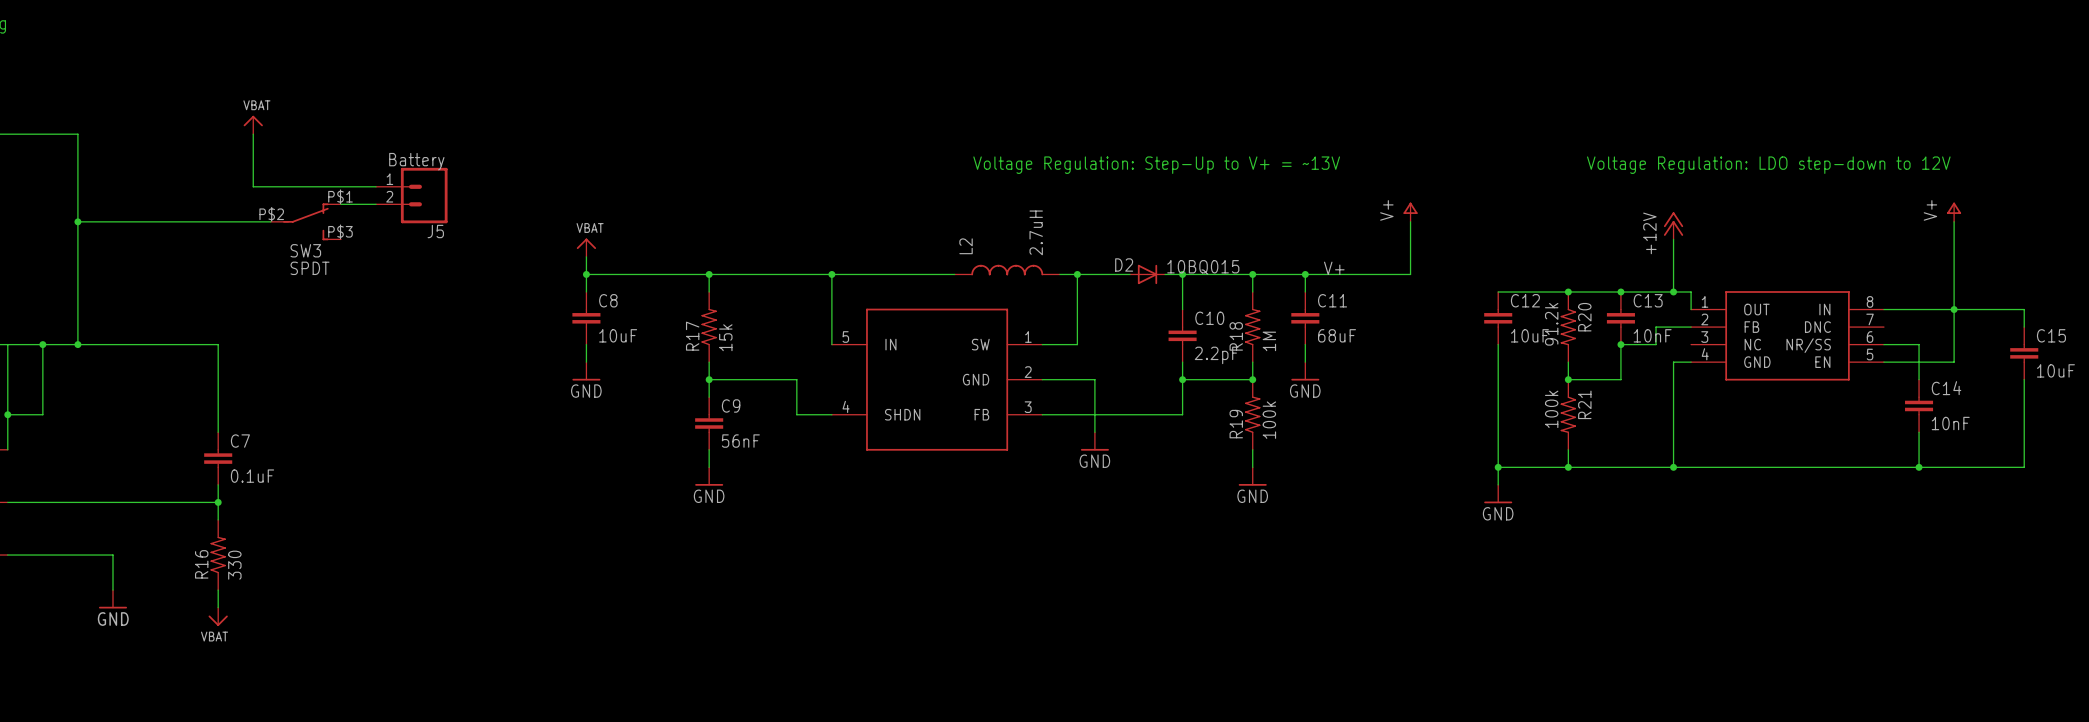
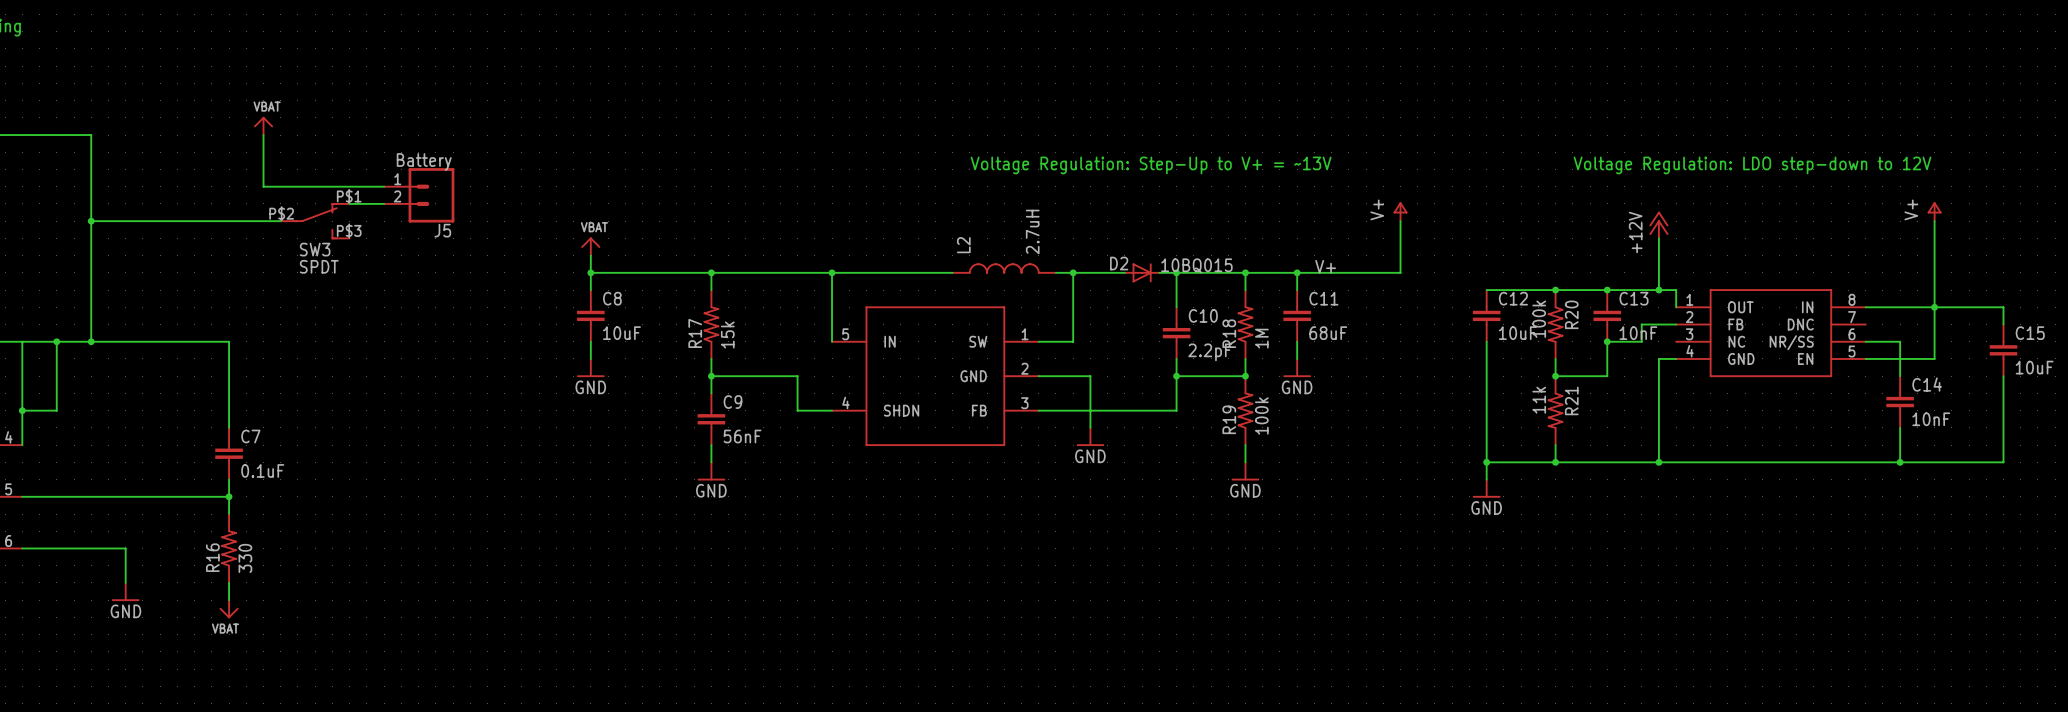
R20 value: 91.2k (1551, 324) -> 100k (1539, 319)
R21 value: 100k (1551, 409) -> 11k (1539, 400)

